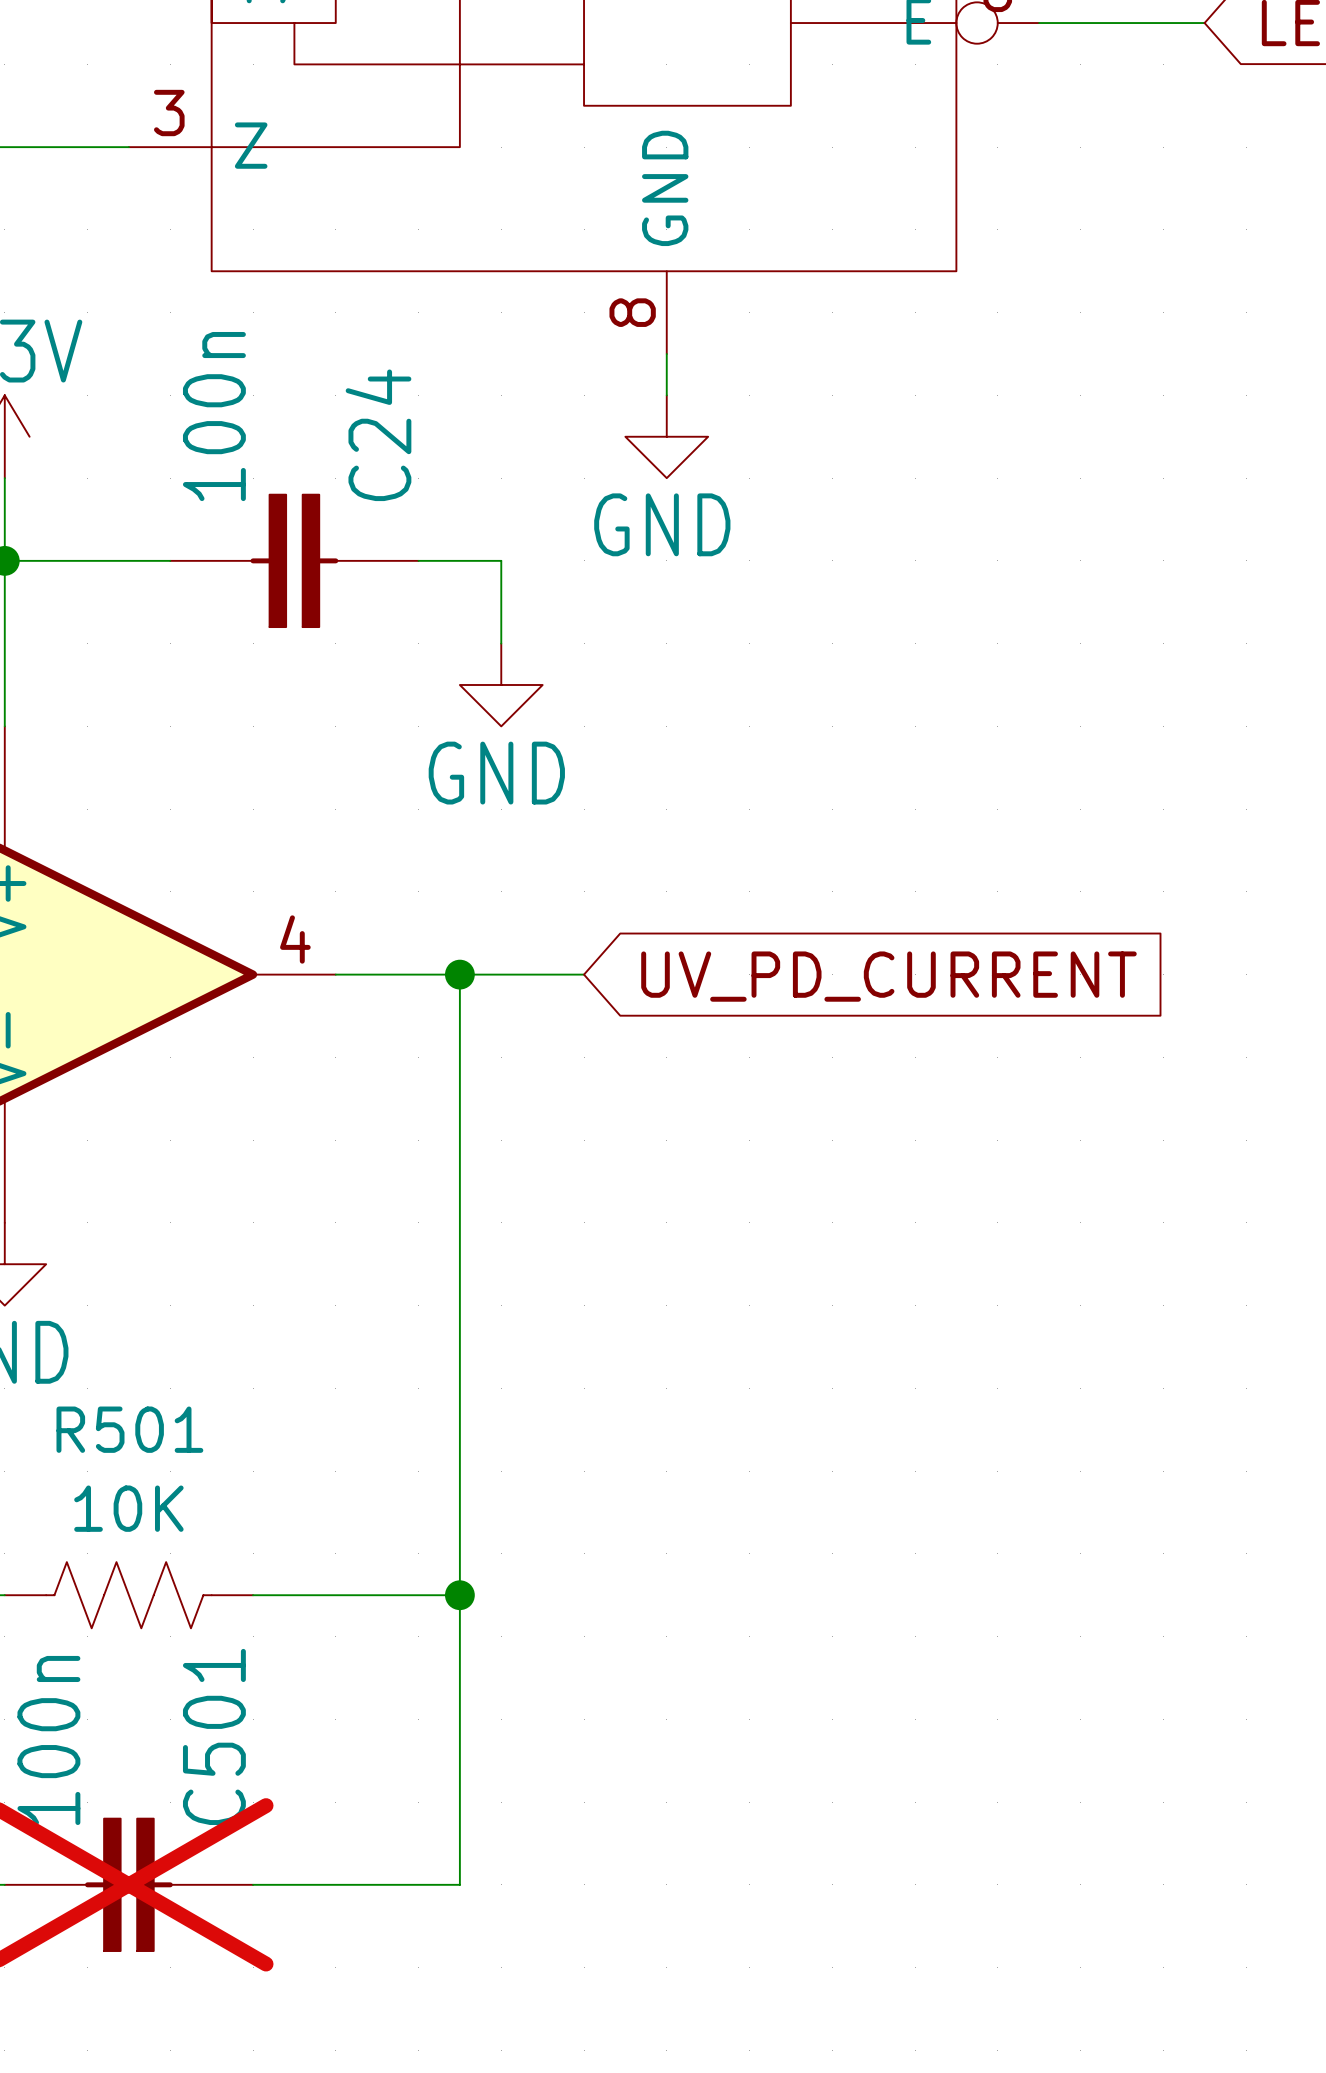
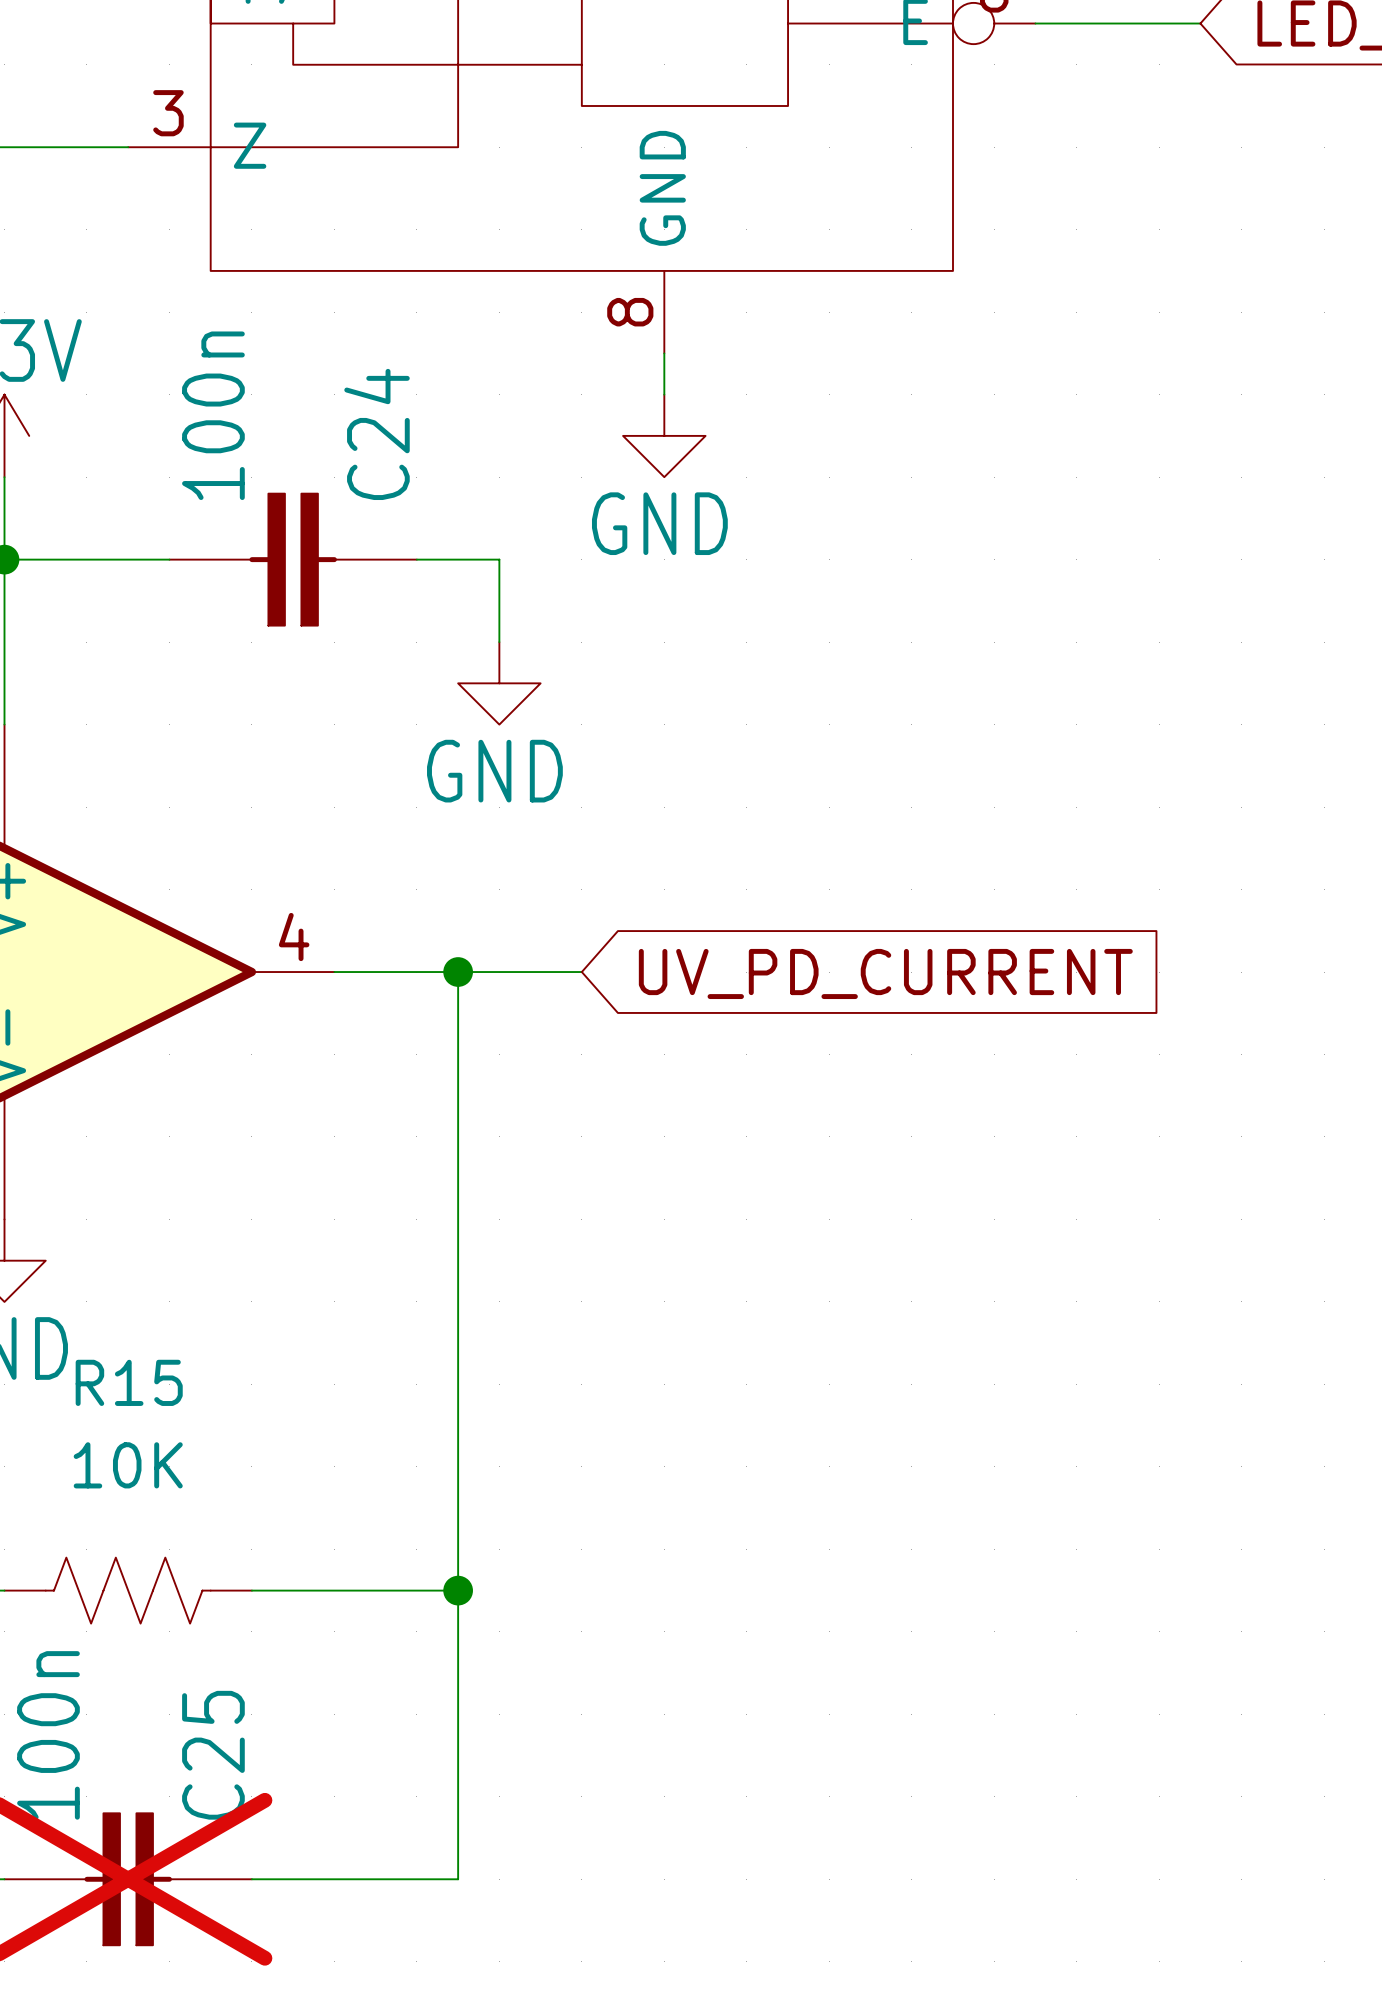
R501 name: R501 (129, 1429) -> R15 (129, 1382)
R501 value position: 10K (128, 1508) -> 10K (128, 1465)
C501 name: C501 (214, 1736) -> C25 (213, 1755)

